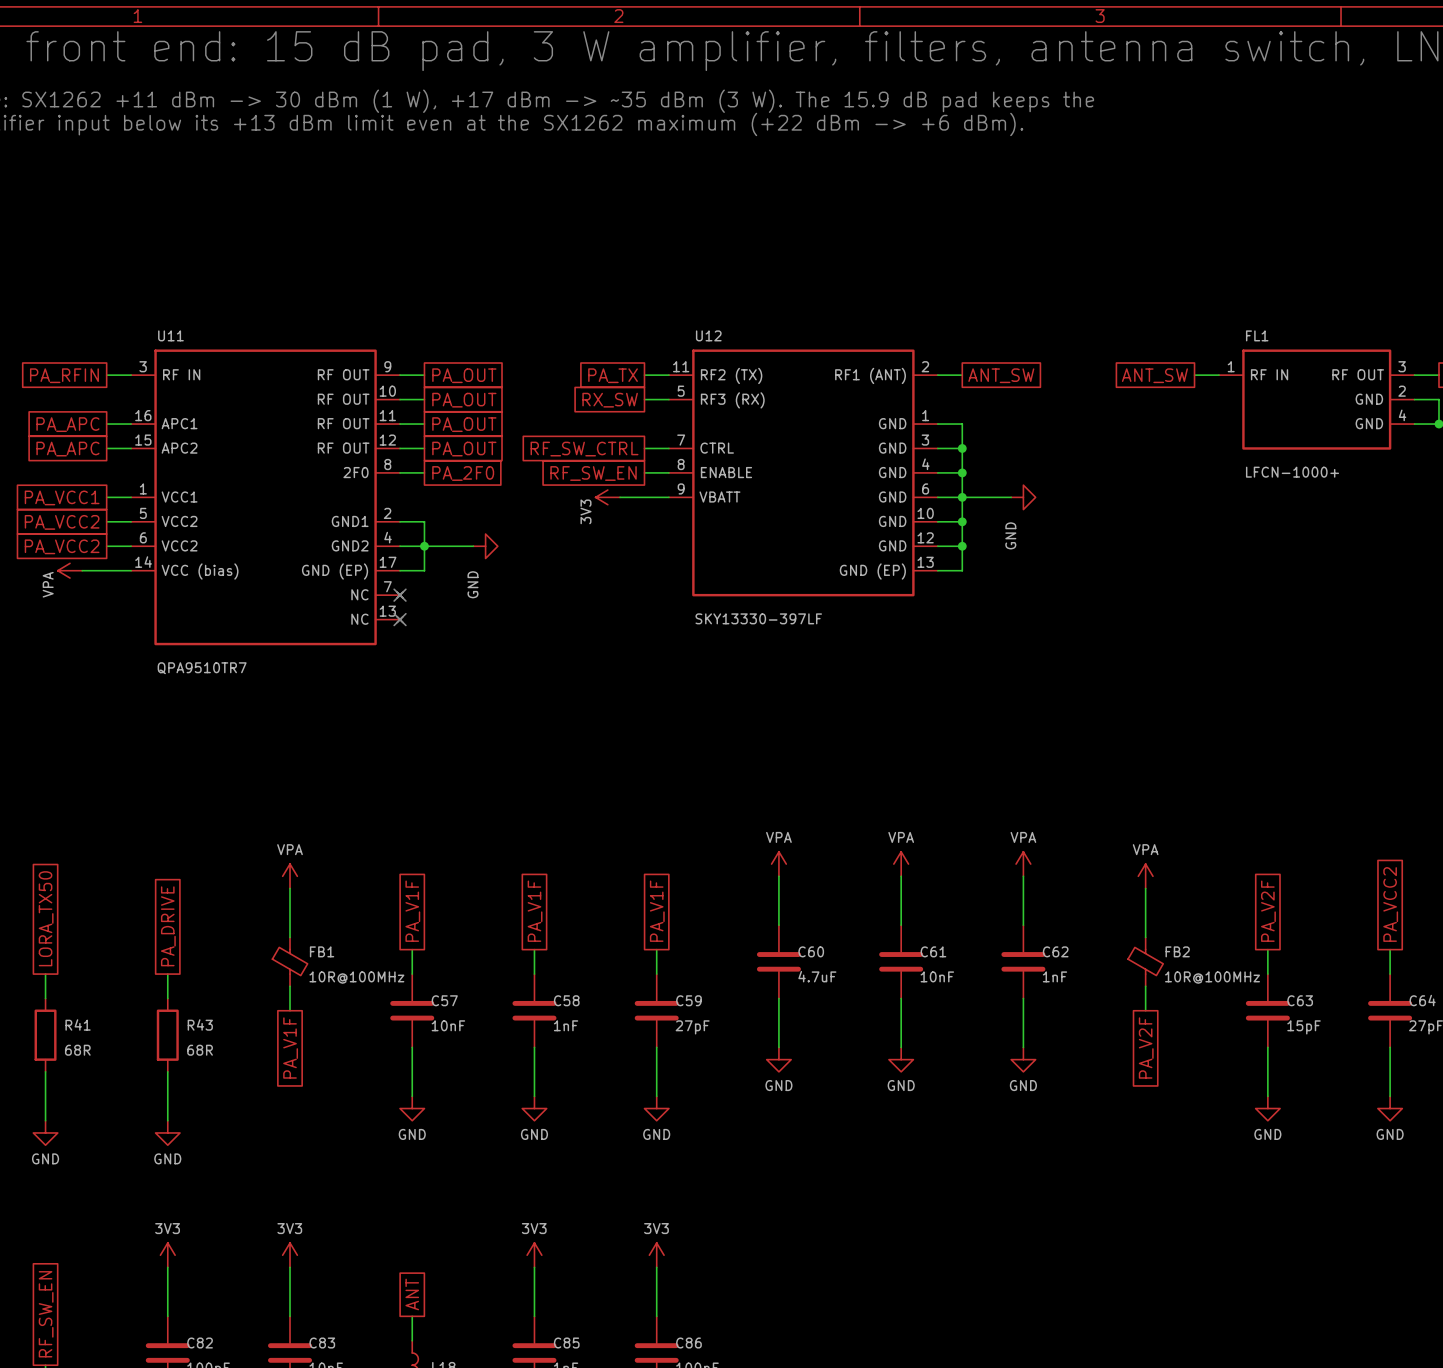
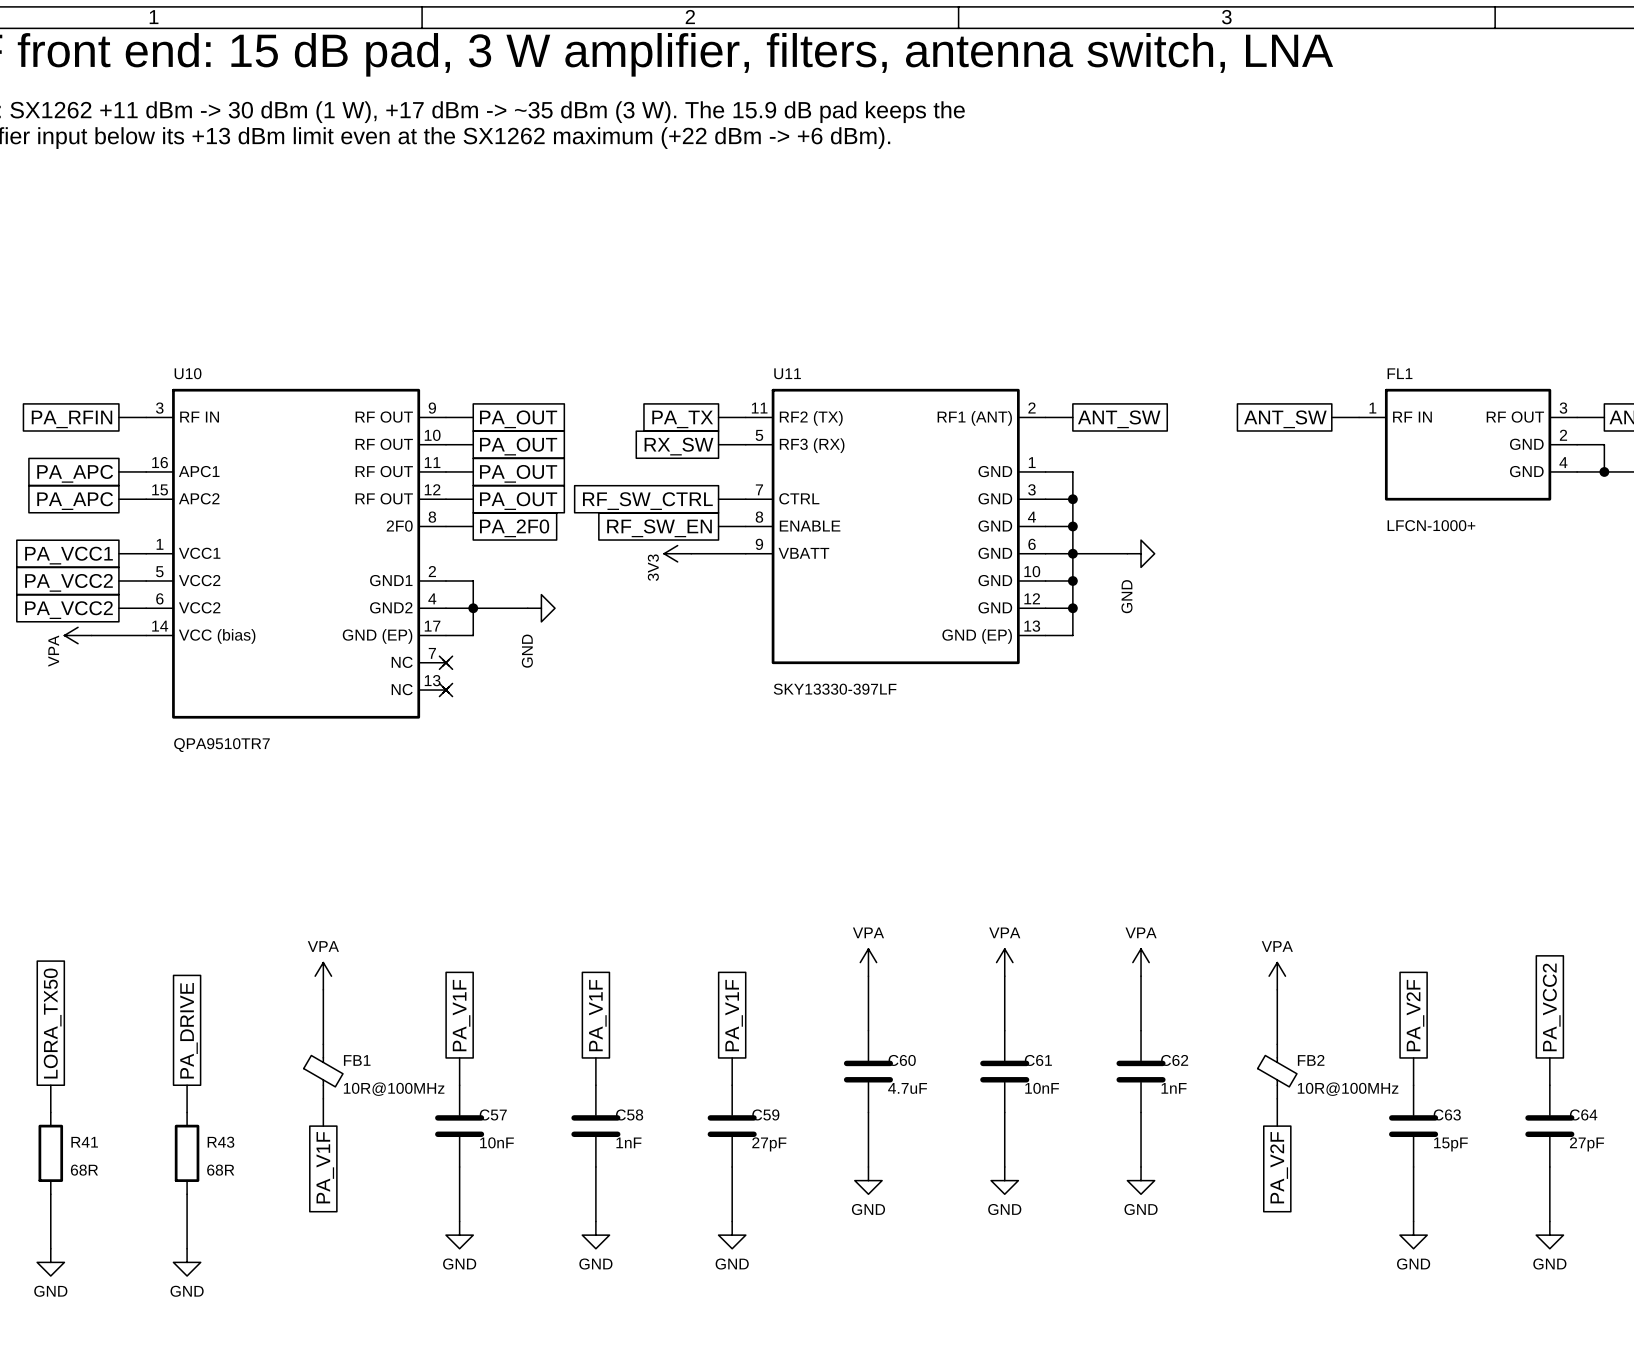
U11 name: U11 (170, 335) -> U10 (188, 373)
U12 name: U12 (708, 335) -> U11 (787, 373)

